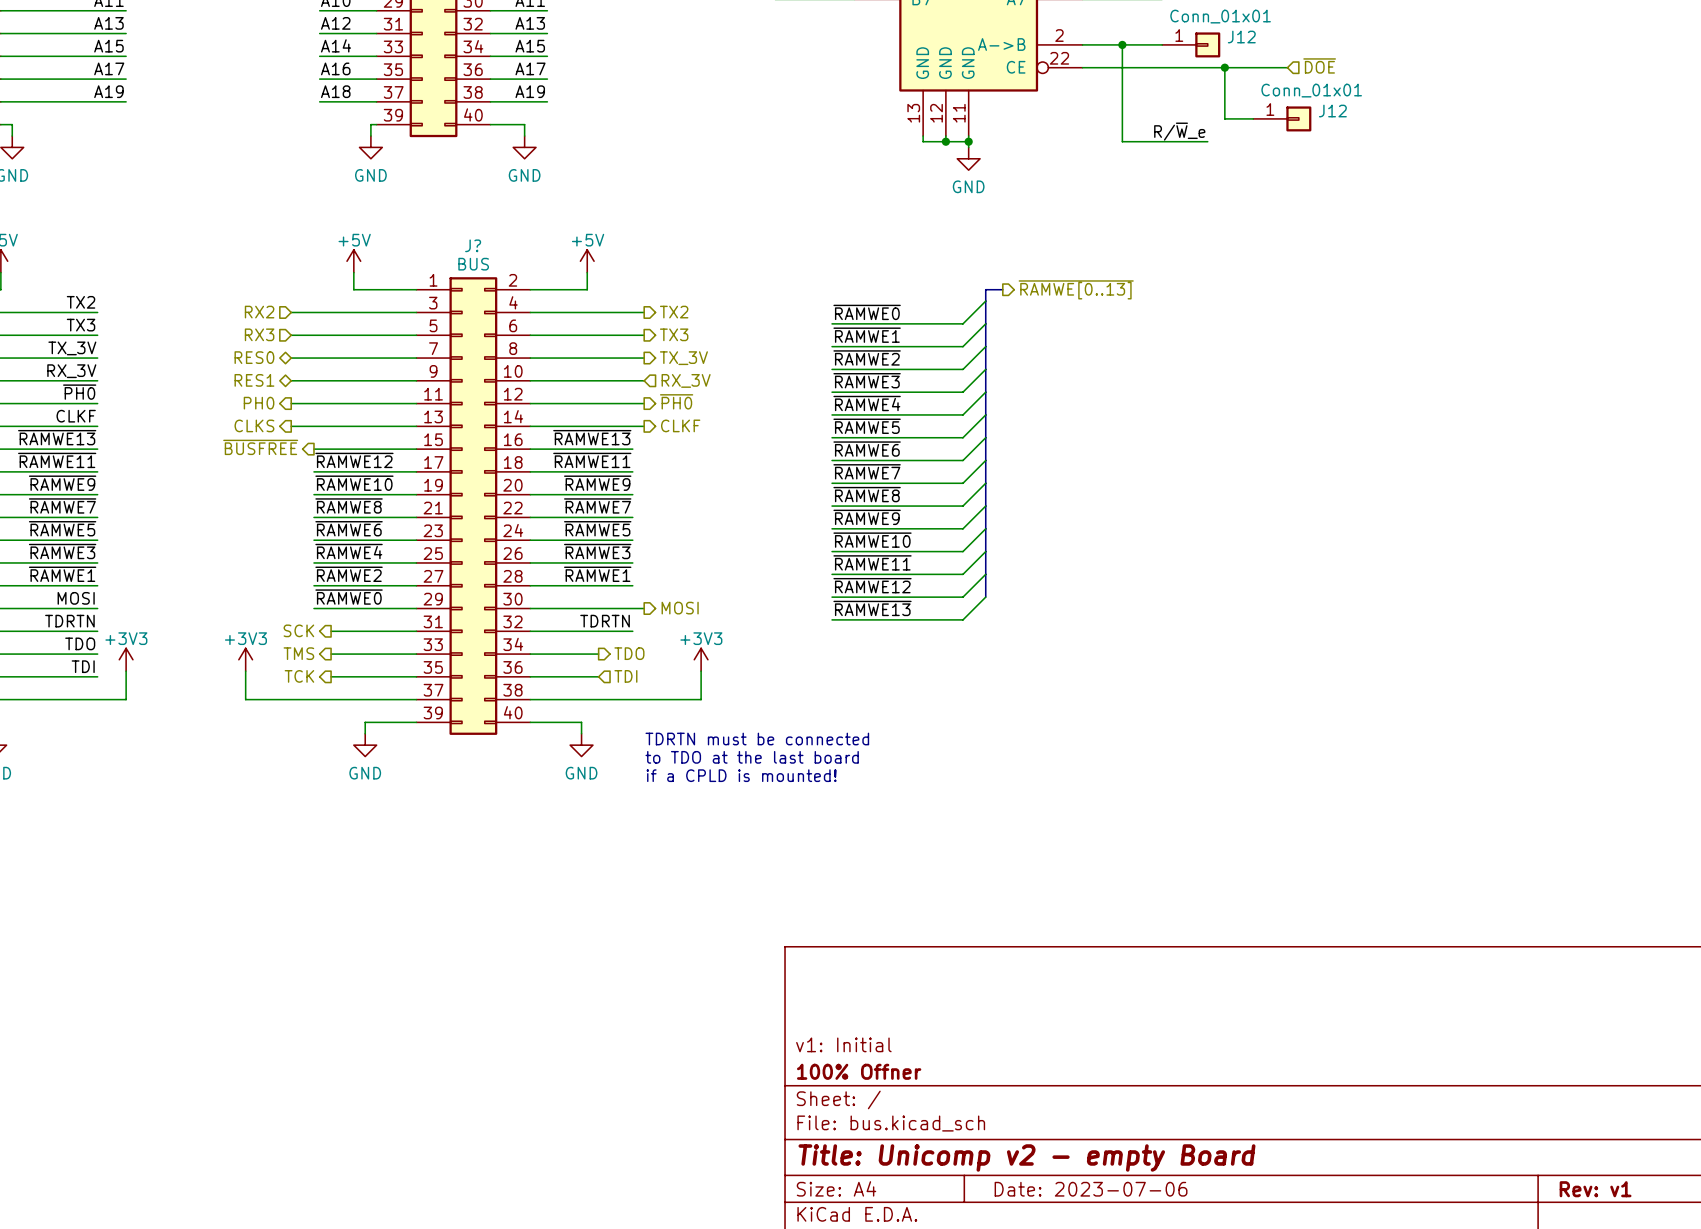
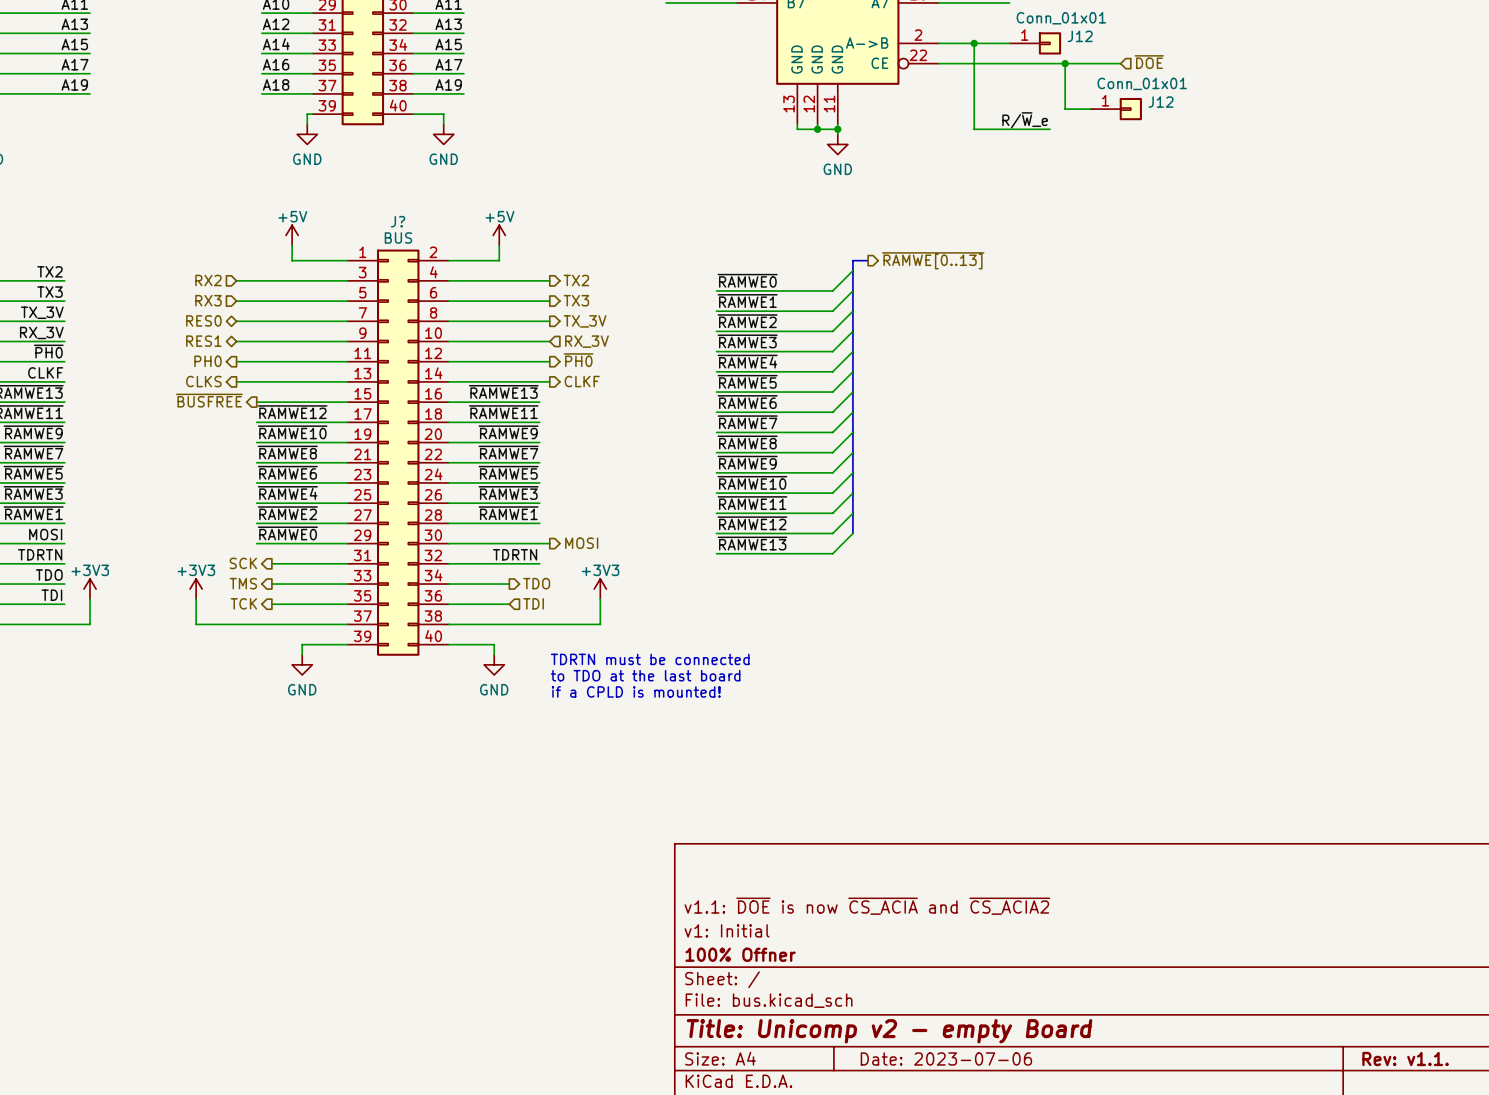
title block: none -> v1.1: ~{DOE} is now ~{CS_ACIA} and ~{CS_ACIA2} (867, 906)
title block: Rev: v1 (1595, 1189) -> Rev: v1.1. (1405, 1058)

